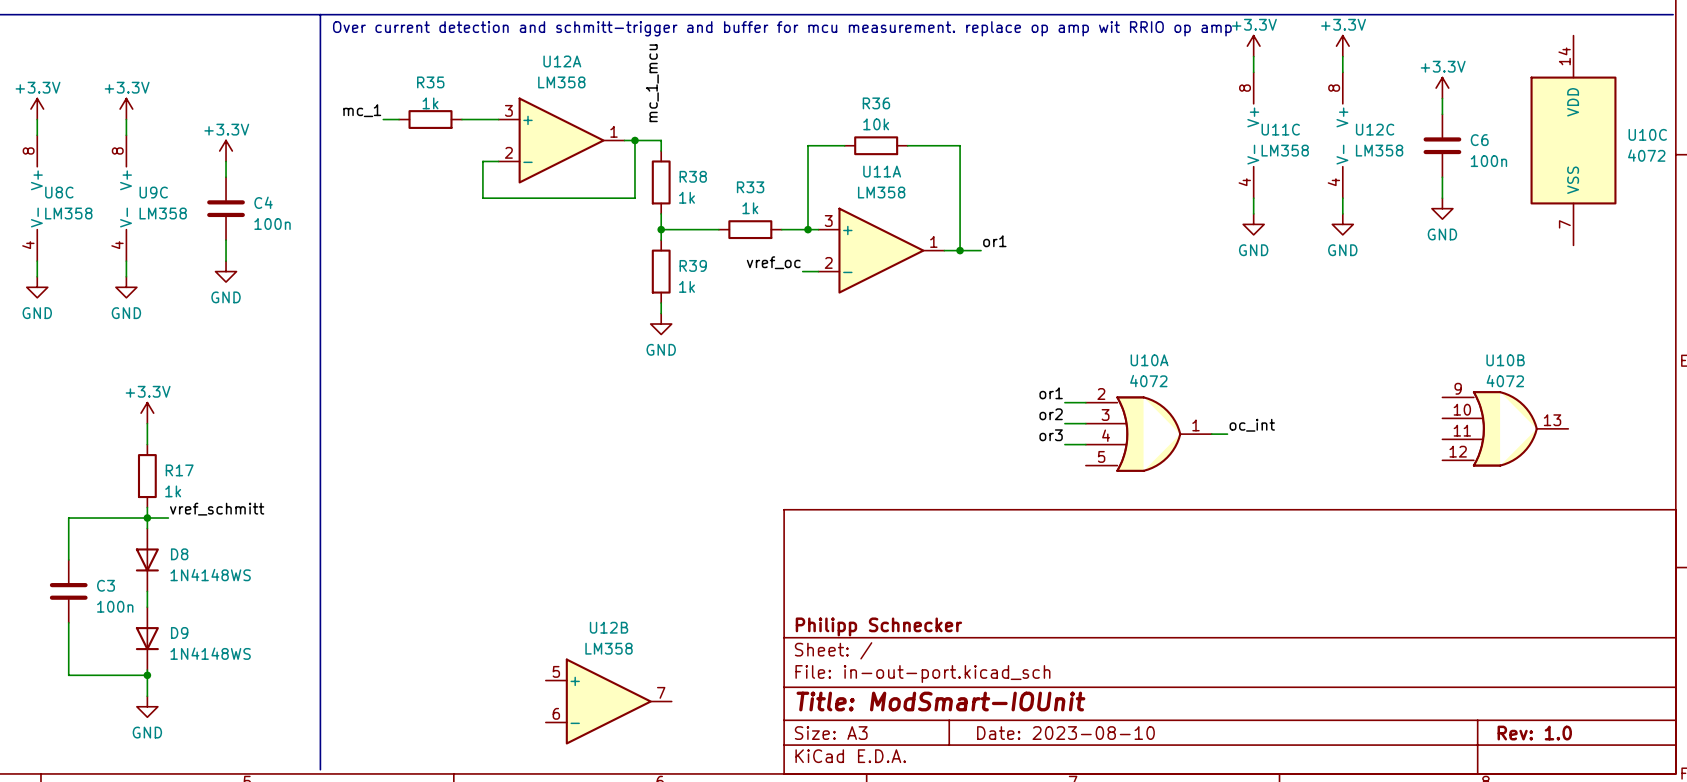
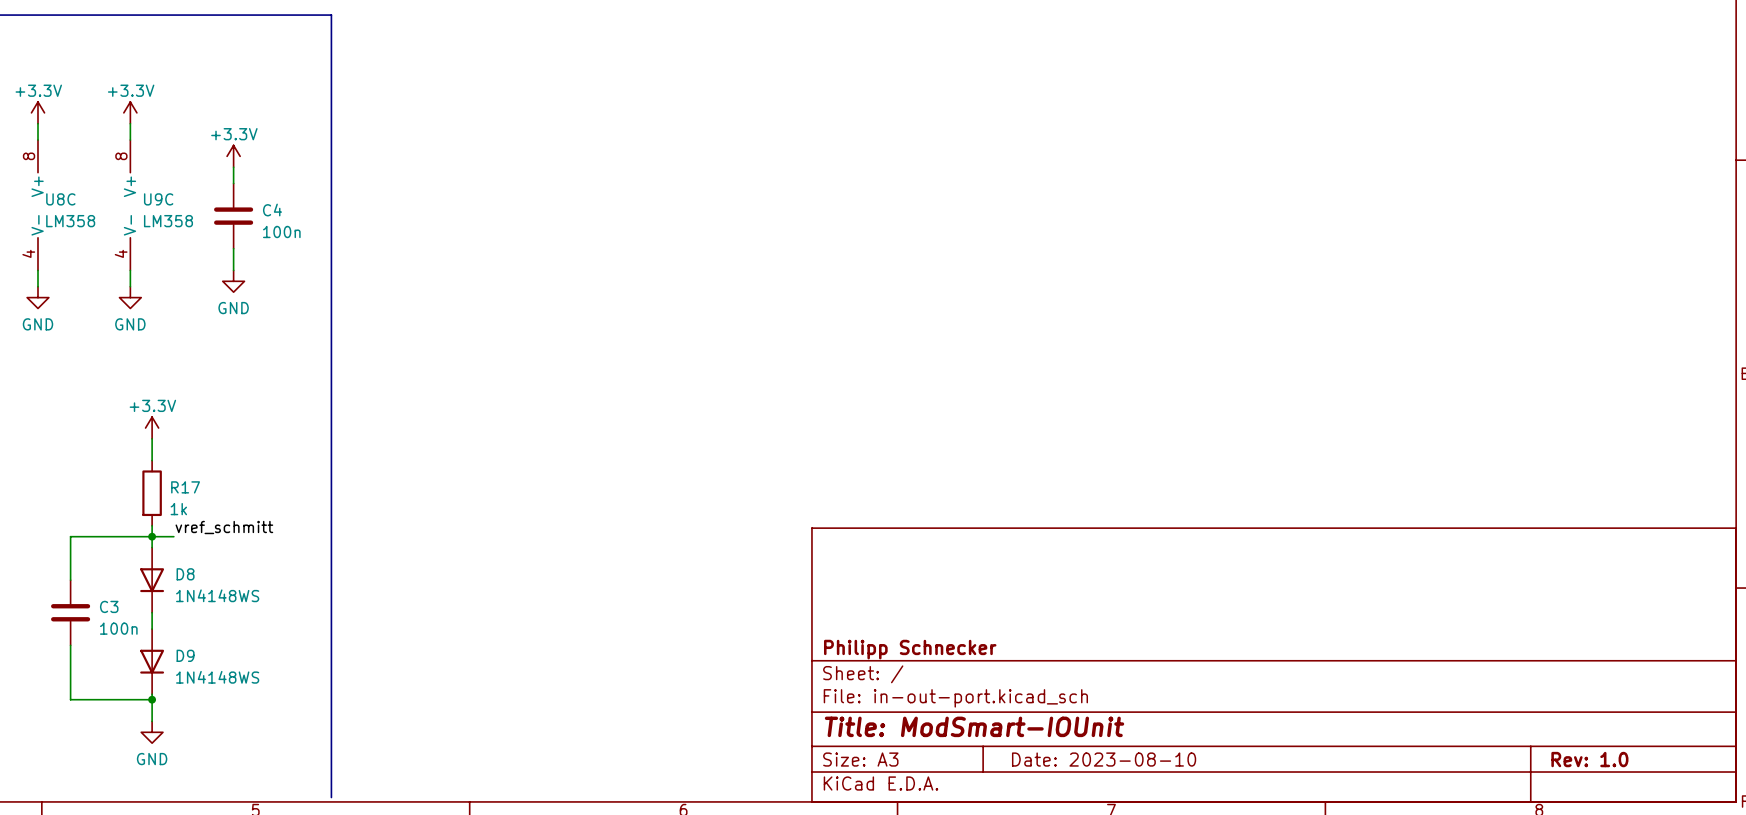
line: (320, 14) (1673, 14) -> none
text: Over current detection and schmitt-trigger and buffer for mcu measurement. replace op amp wit RRIO op amp (782, 28) -> none
power symbol: +3.3V (1253, 46) -> none
power symbol: +3.3V (1342, 46) -> none
wire: (1253, 56) (1253, 72) -> none
wire: (1342, 56) (1342, 72) -> none
label: mc_1_mcu (652, 83) -> none
power symbol: +3.3V (1442, 88) -> none
wire: (1442, 98) (1442, 114) -> none
label: mc_1 (362, 110) -> none
wire: (383, 119) (399, 119) -> none
R35: 1k (430, 119) -> none
wire: (461, 119) (498, 119) -> none
U11C: LM358 (1253, 135) -> none
U12C: LM358 (1342, 135) -> none
U12A: LM358 (561, 140) -> none
wire: (624, 140) (661, 140) (661, 150) -> none
wire: (634, 140) (634, 198) (482, 198) (482, 161) (498, 161) -> none
junction: (634, 140) -> none
U10C: 4072 (1573, 140) -> none
wire: (844, 145) (808, 145) (808, 229) -> none
R36: 10k (876, 145) -> none
wire: (907, 145) (960, 145) (960, 250) -> none
C6: 100n (1442, 145) -> none
wire: (1442, 177) (1442, 198) -> none
R38: 1k (661, 182) -> none
wire: (1253, 198) (1253, 213) -> none
wire: (1342, 198) (1342, 213) -> none
power symbol: GND (1442, 208) -> none
wire: (661, 213) (661, 240) -> none
power symbol: GND (1253, 224) -> none
power symbol: GND (1342, 224) -> none
wire: (661, 229) (718, 229) -> none
junction: (661, 229) -> none
R33: 1k (750, 229) -> none
wire: (781, 229) (818, 229) -> none
junction: (808, 229) -> none
label: or1 (994, 241) -> none
U11A: LM358 (881, 250) -> none
wire: (944, 250) (981, 250) -> none
junction: (960, 250) -> none
label: vref_oc (773, 262) -> none
R39: 1k (661, 271) -> none
wire: (802, 271) (818, 271) -> none
wire: (661, 303) (661, 313) -> none
power symbol: GND (661, 324) -> none
label: or1 (1051, 393) -> none
wire: (1064, 402) (1085, 402) -> none
label: or2 (1051, 414) -> none
wire: (1064, 423) (1085, 423) -> none
label: oc_int (1252, 425) -> none
U10B: 4072 (1505, 428) -> none
U10A: 4072 (1148, 434) -> none
wire: (1211, 434) (1227, 434) -> none
label: or3 (1051, 435) -> none
wire: (1064, 444) (1085, 444) -> none
U12B: LM358 (608, 701) -> none

